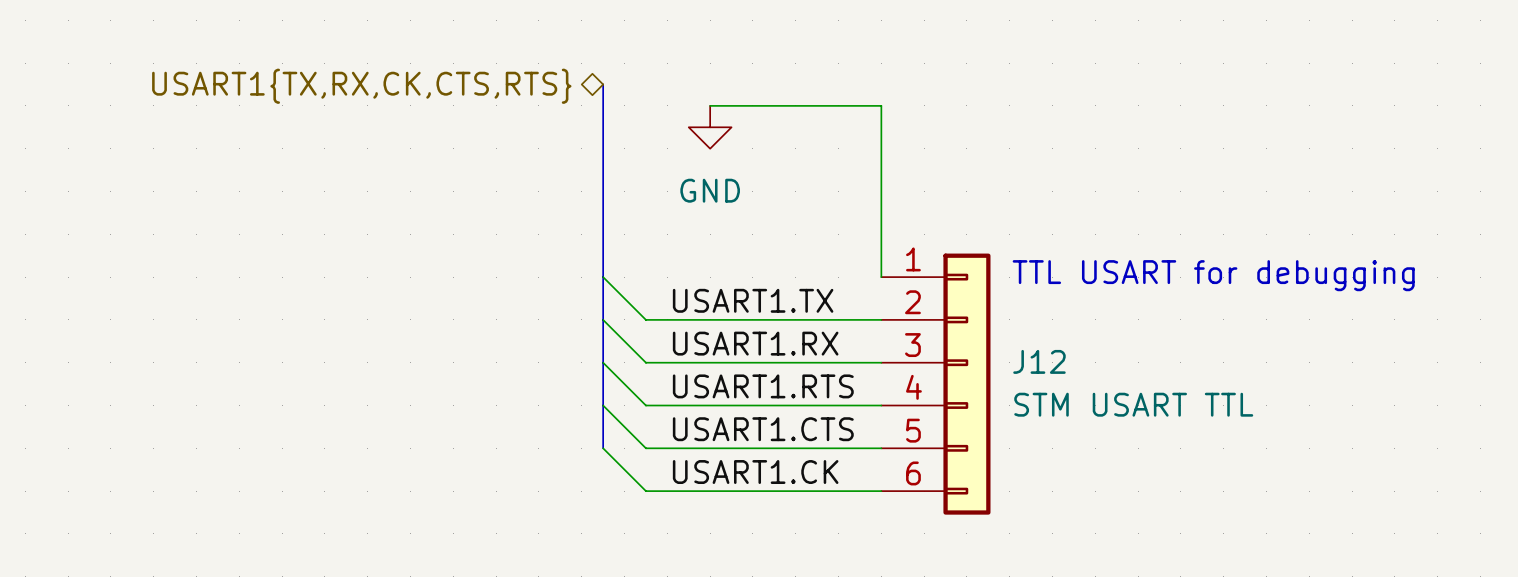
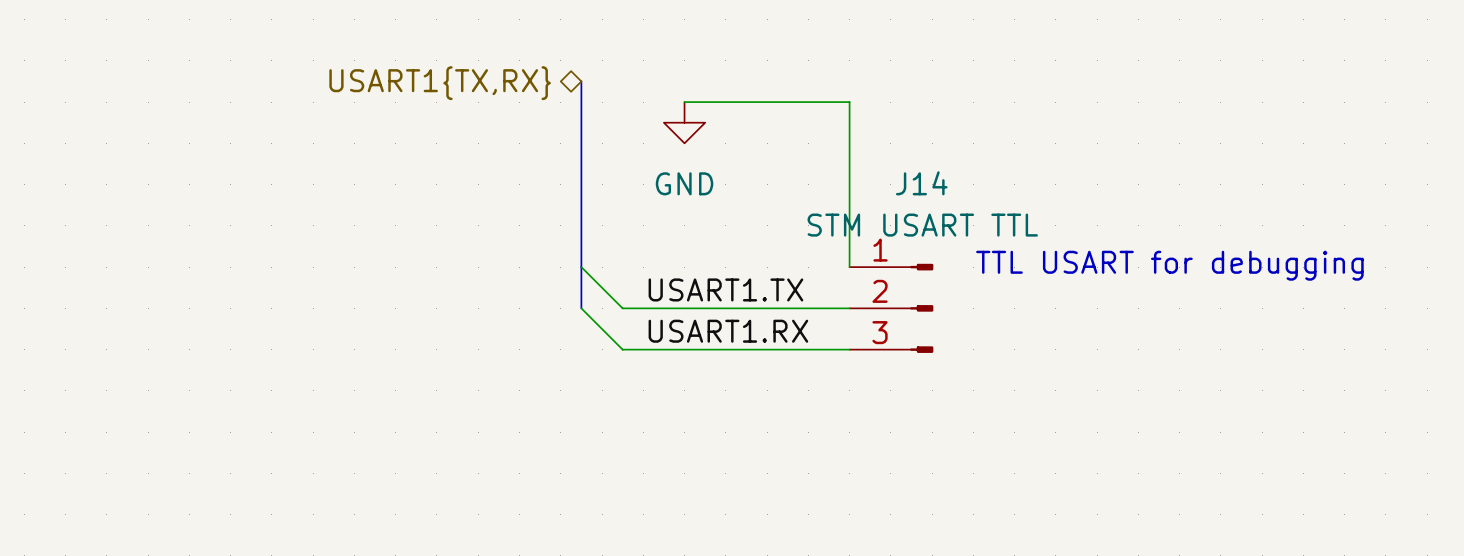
hierarchical label: USART1{TX,RX,CK,CTS,RTS} (361, 86) -> USART1{TX,RX} (440, 83)
bus: (603, 319) (603, 448) -> none
J14: none -> STM USART TTL (891, 308)
wire: (603, 362) (645, 405) (881, 405) -> none
J12: STM USART TTL (935, 384) -> none
label: USART1.RTS (763, 386) -> none
wire: (603, 405) (645, 448) (881, 448) -> none
label: USART1.CTS (763, 429) -> none
wire: (603, 448) (645, 491) (881, 491) -> none
label: USART1.CK (755, 472) -> none

